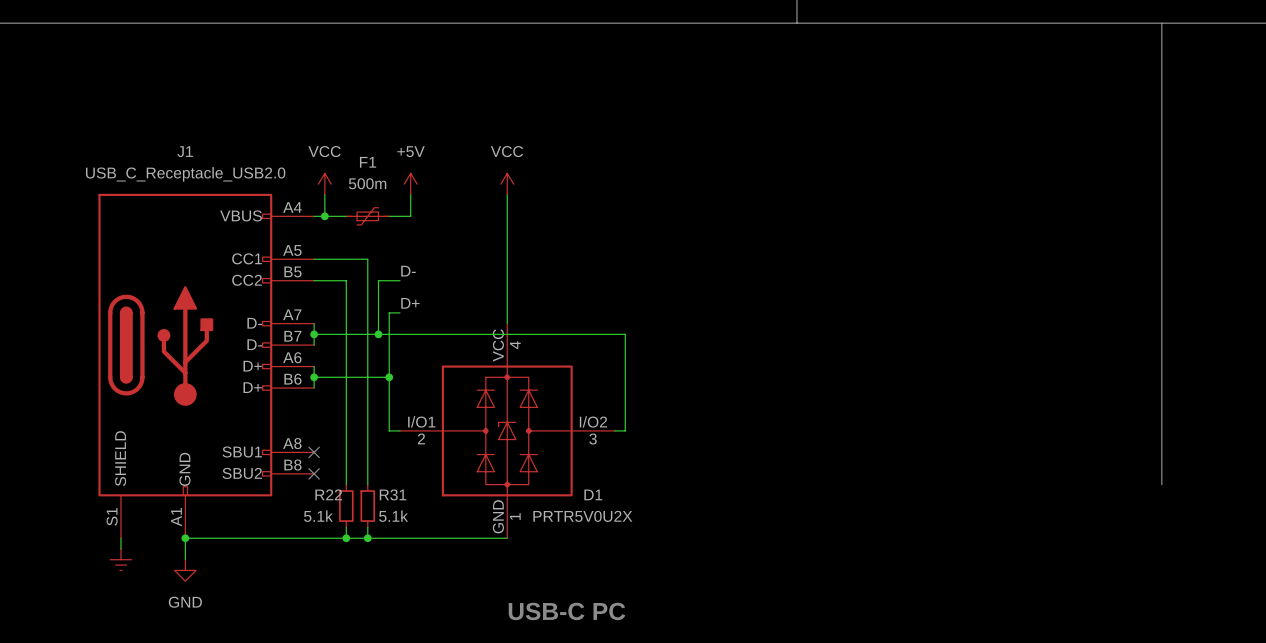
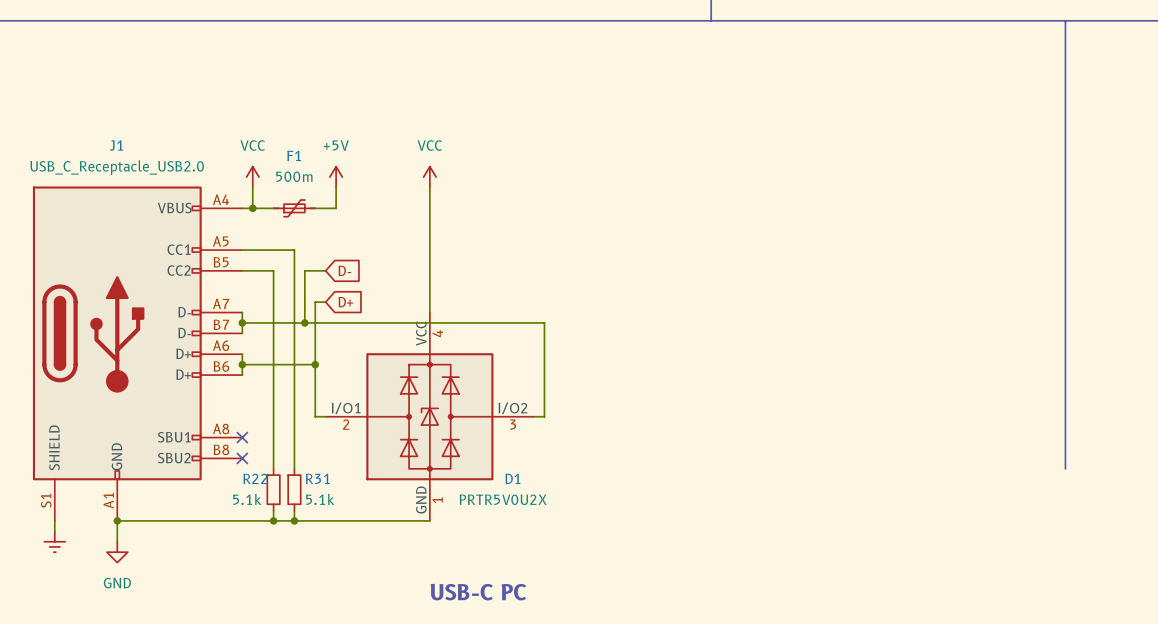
label: D- (408, 271) -> none
global label: none -> D- (344, 270)
label: D+ (410, 303) -> none
global label: none -> D+ (345, 302)

